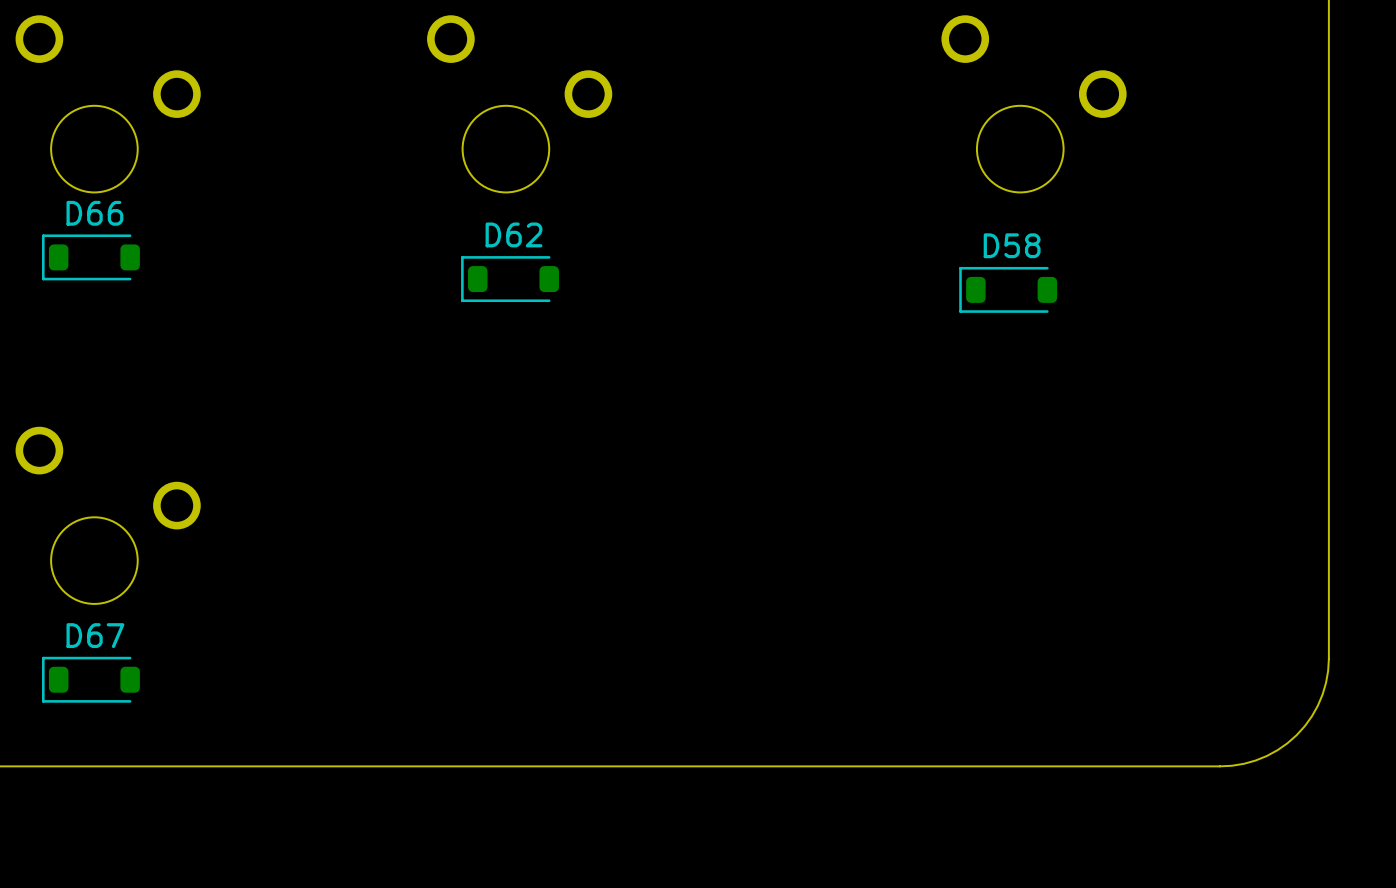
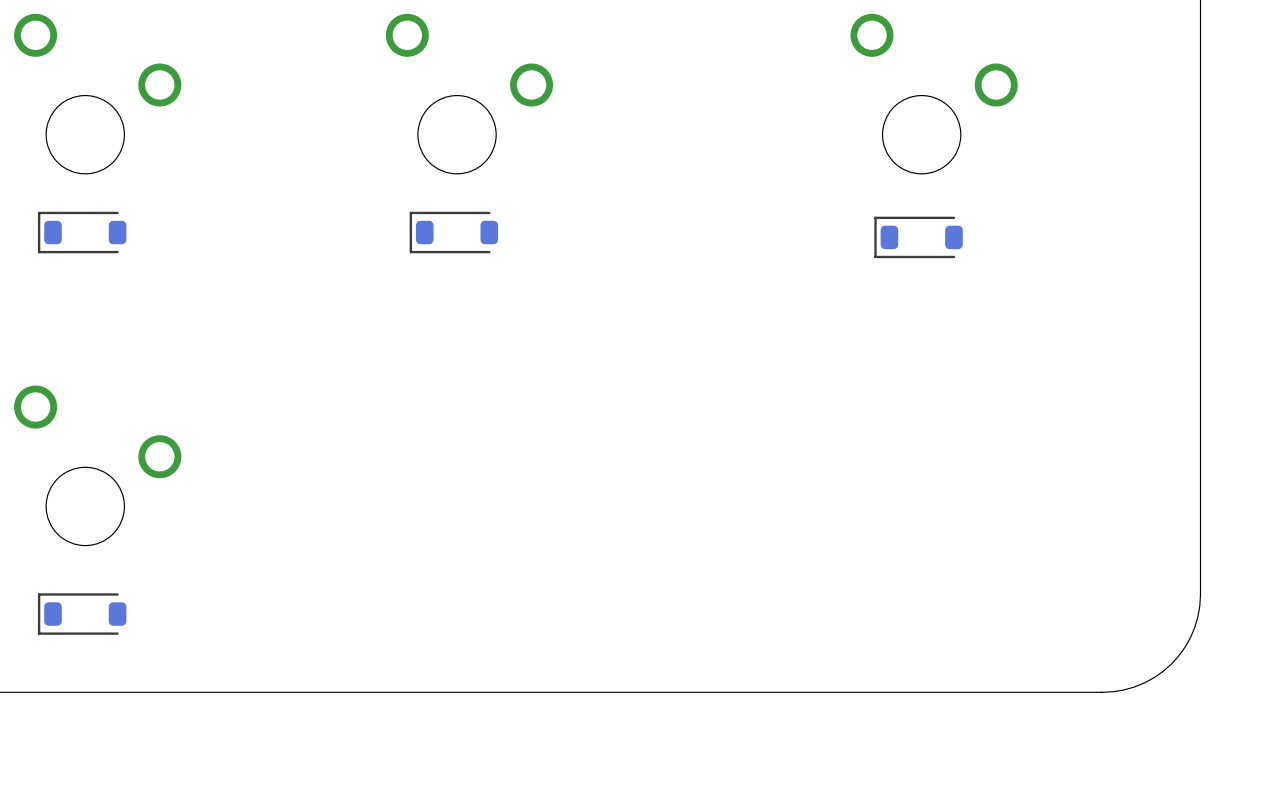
D66 name: D66 (94, 213) -> none
part: none -> (453, 232)
part: none -> (918, 237)
D62: (510, 279) -> none
D58: (1008, 289) -> none
D67 name: D67 (95, 635) -> none

